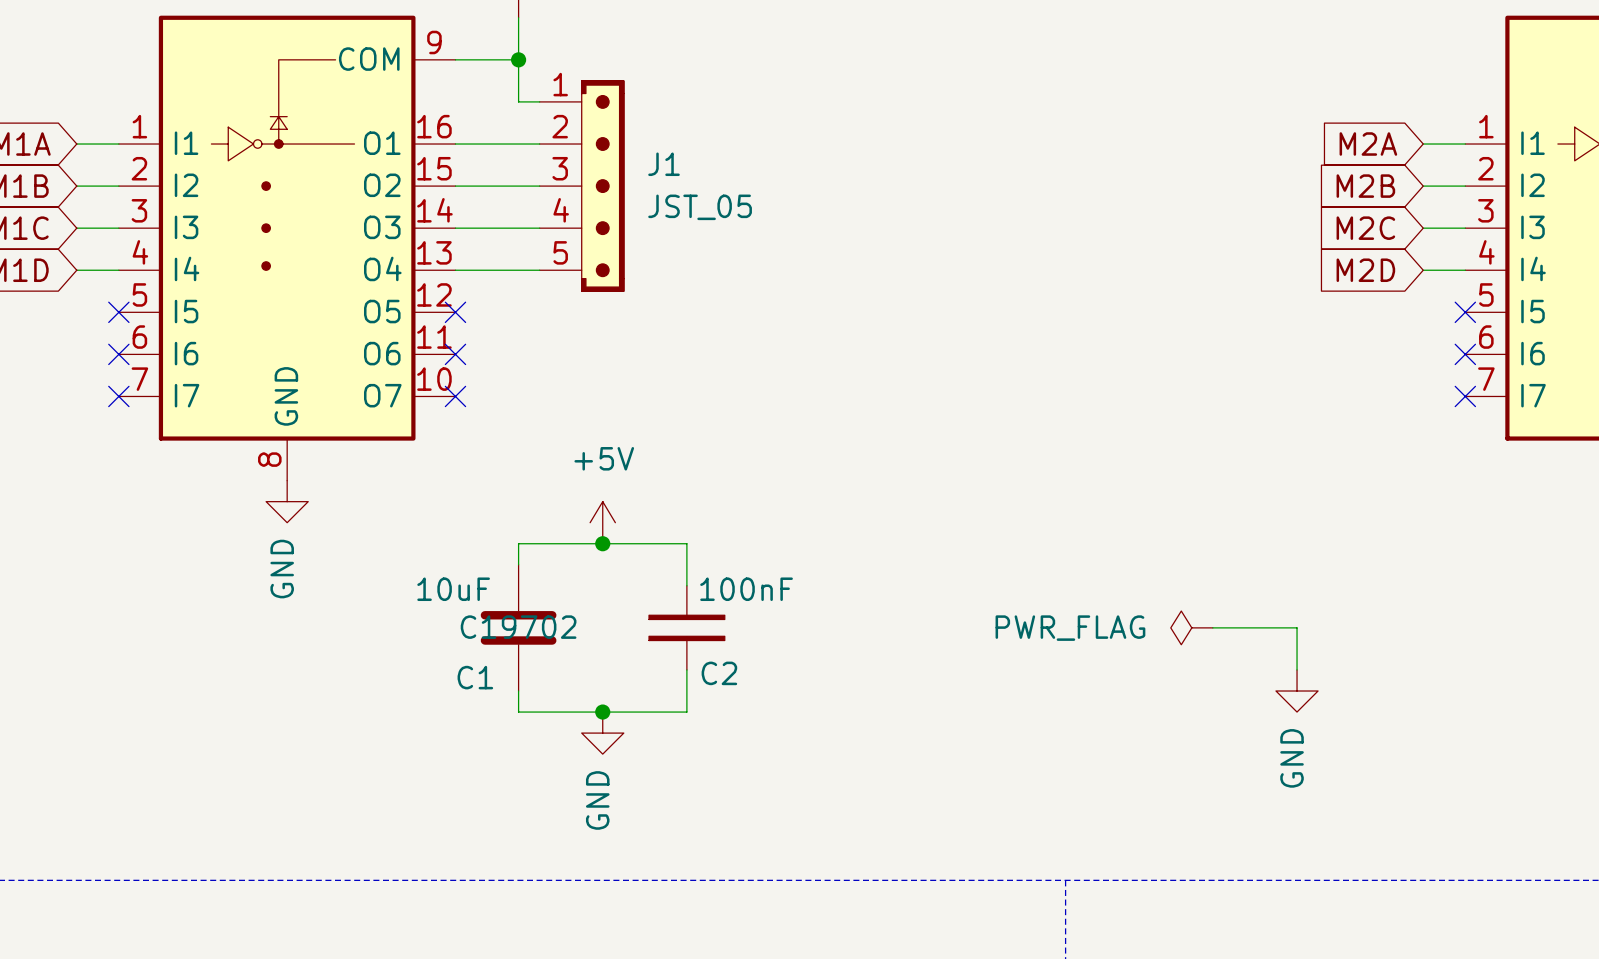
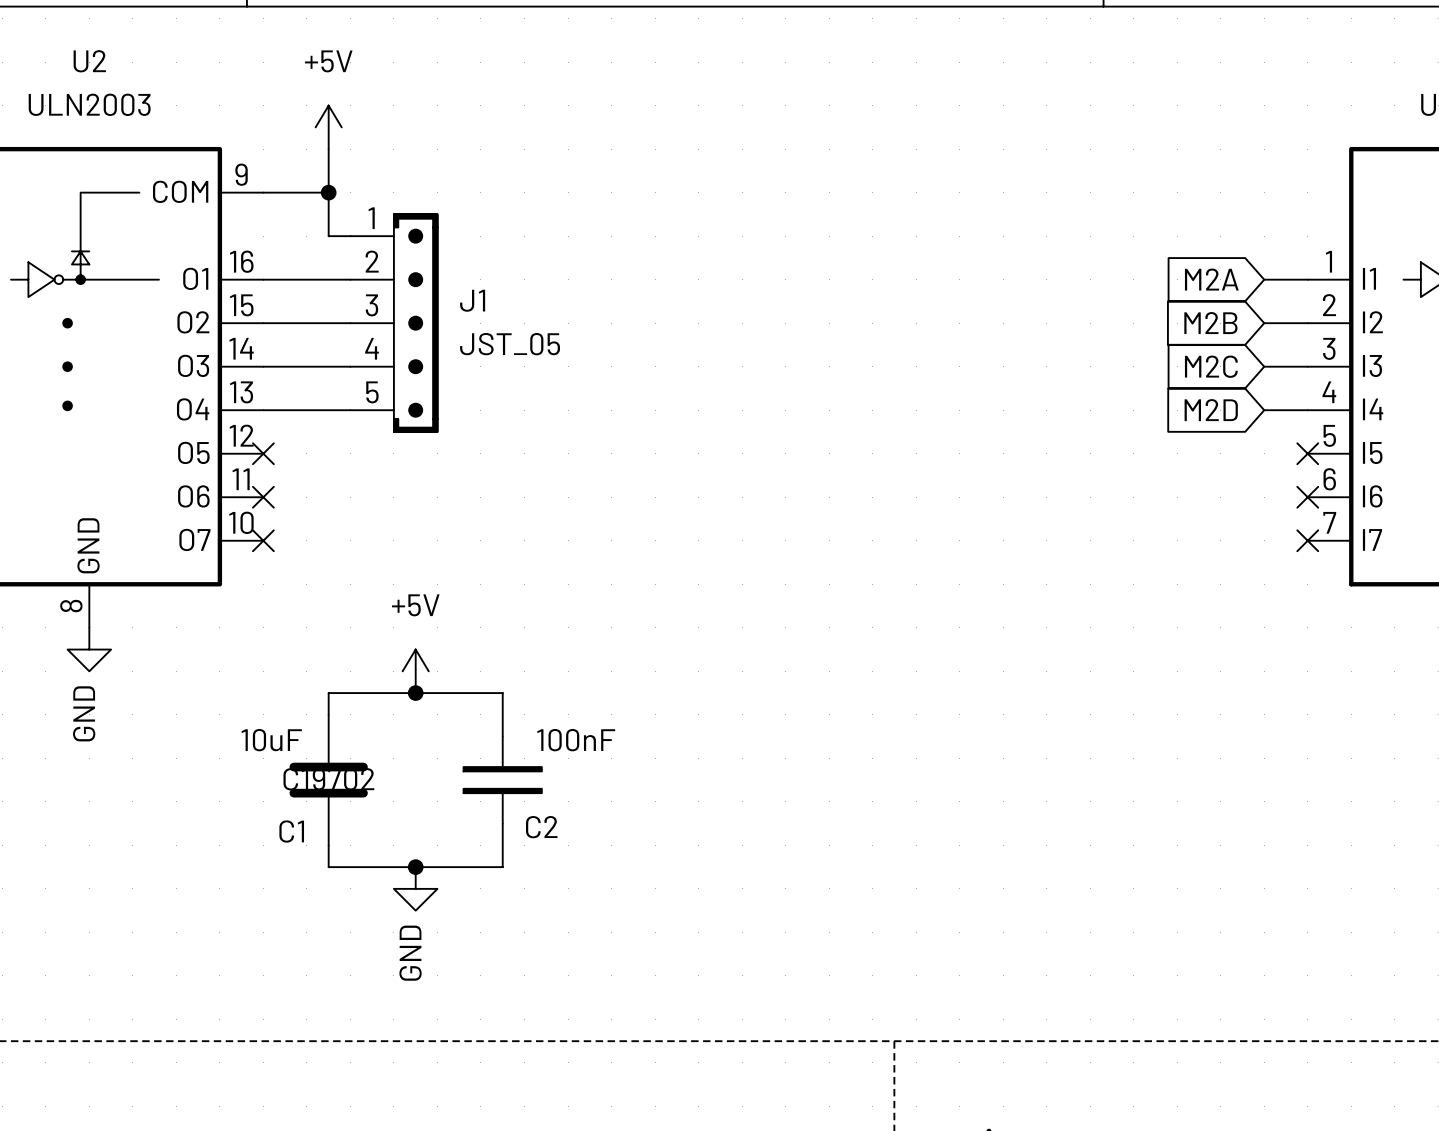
power symbol: PWR_FLAG (1191, 627) -> none
wire: (1212, 627) (1297, 627) (1297, 669) -> none
power symbol: GND (1297, 691) -> none

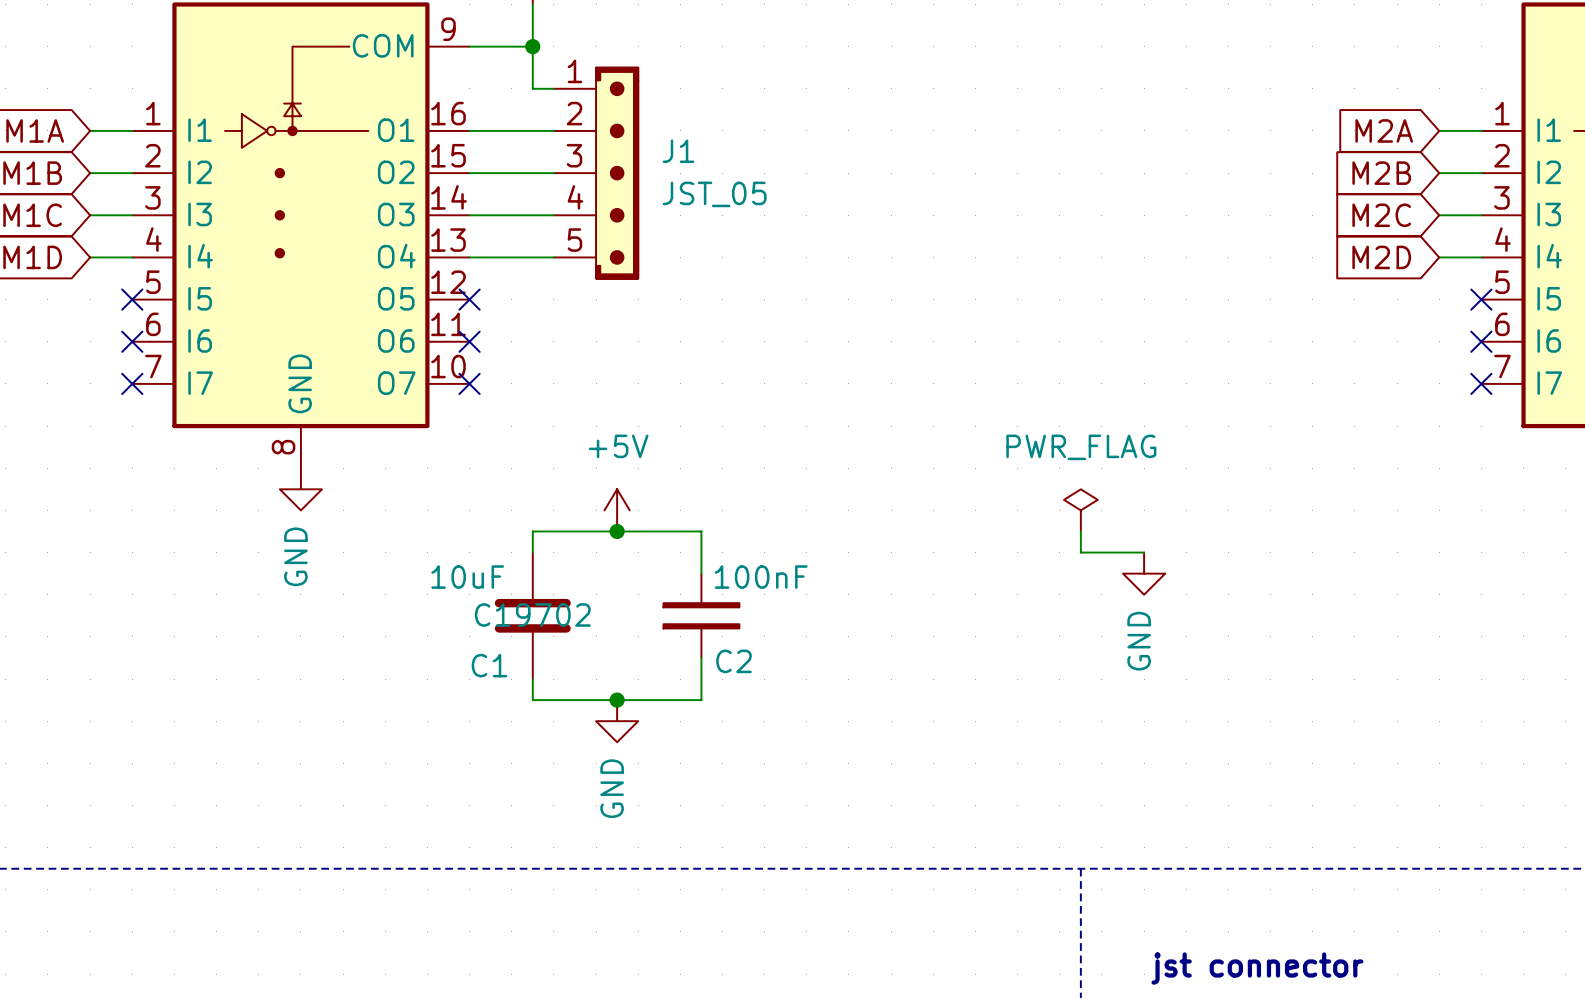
power symbol: none -> PWR_FLAG (1080, 510)
wire: none -> (1080, 531) (1080, 552) (1144, 552)
power symbol: none -> GND (1144, 573)

